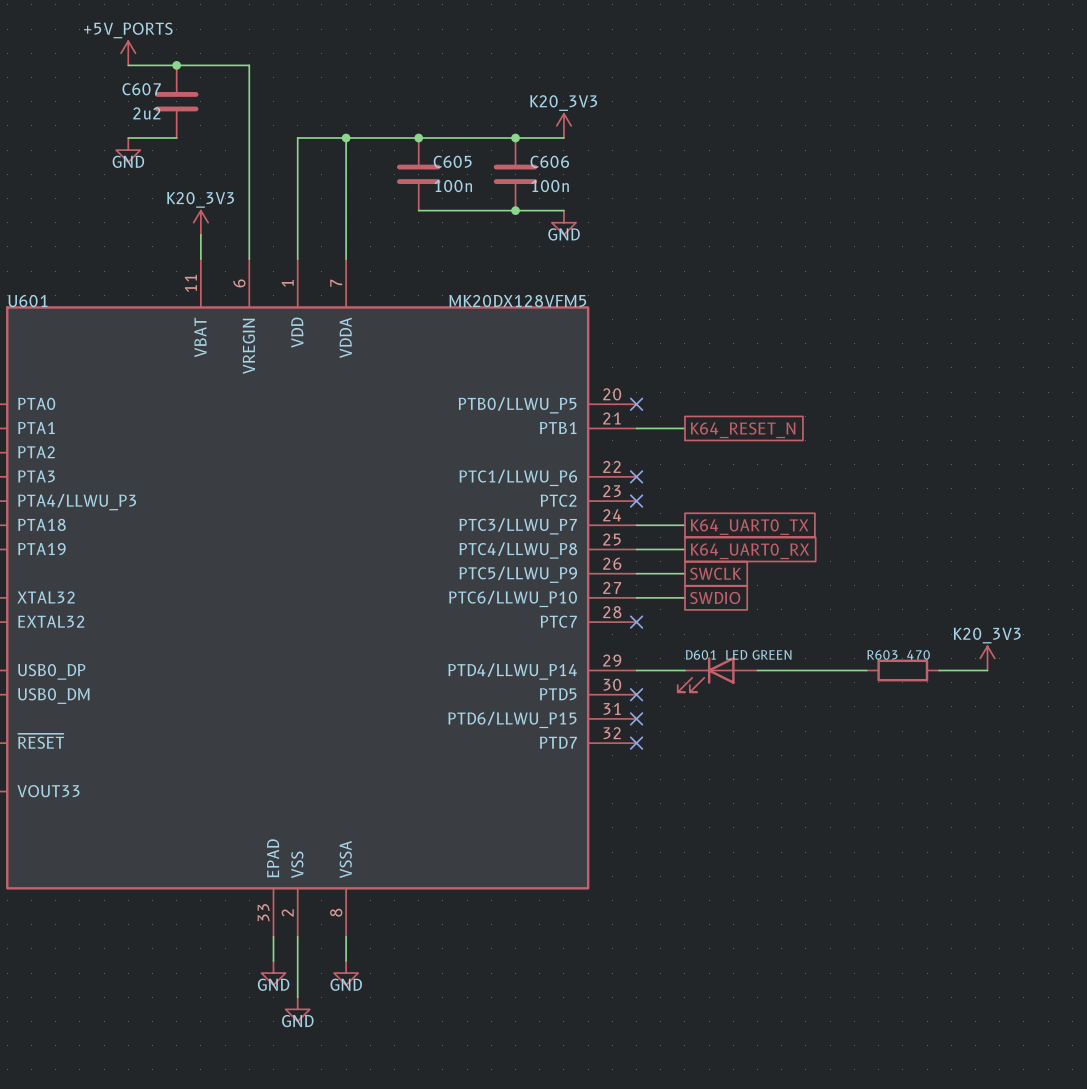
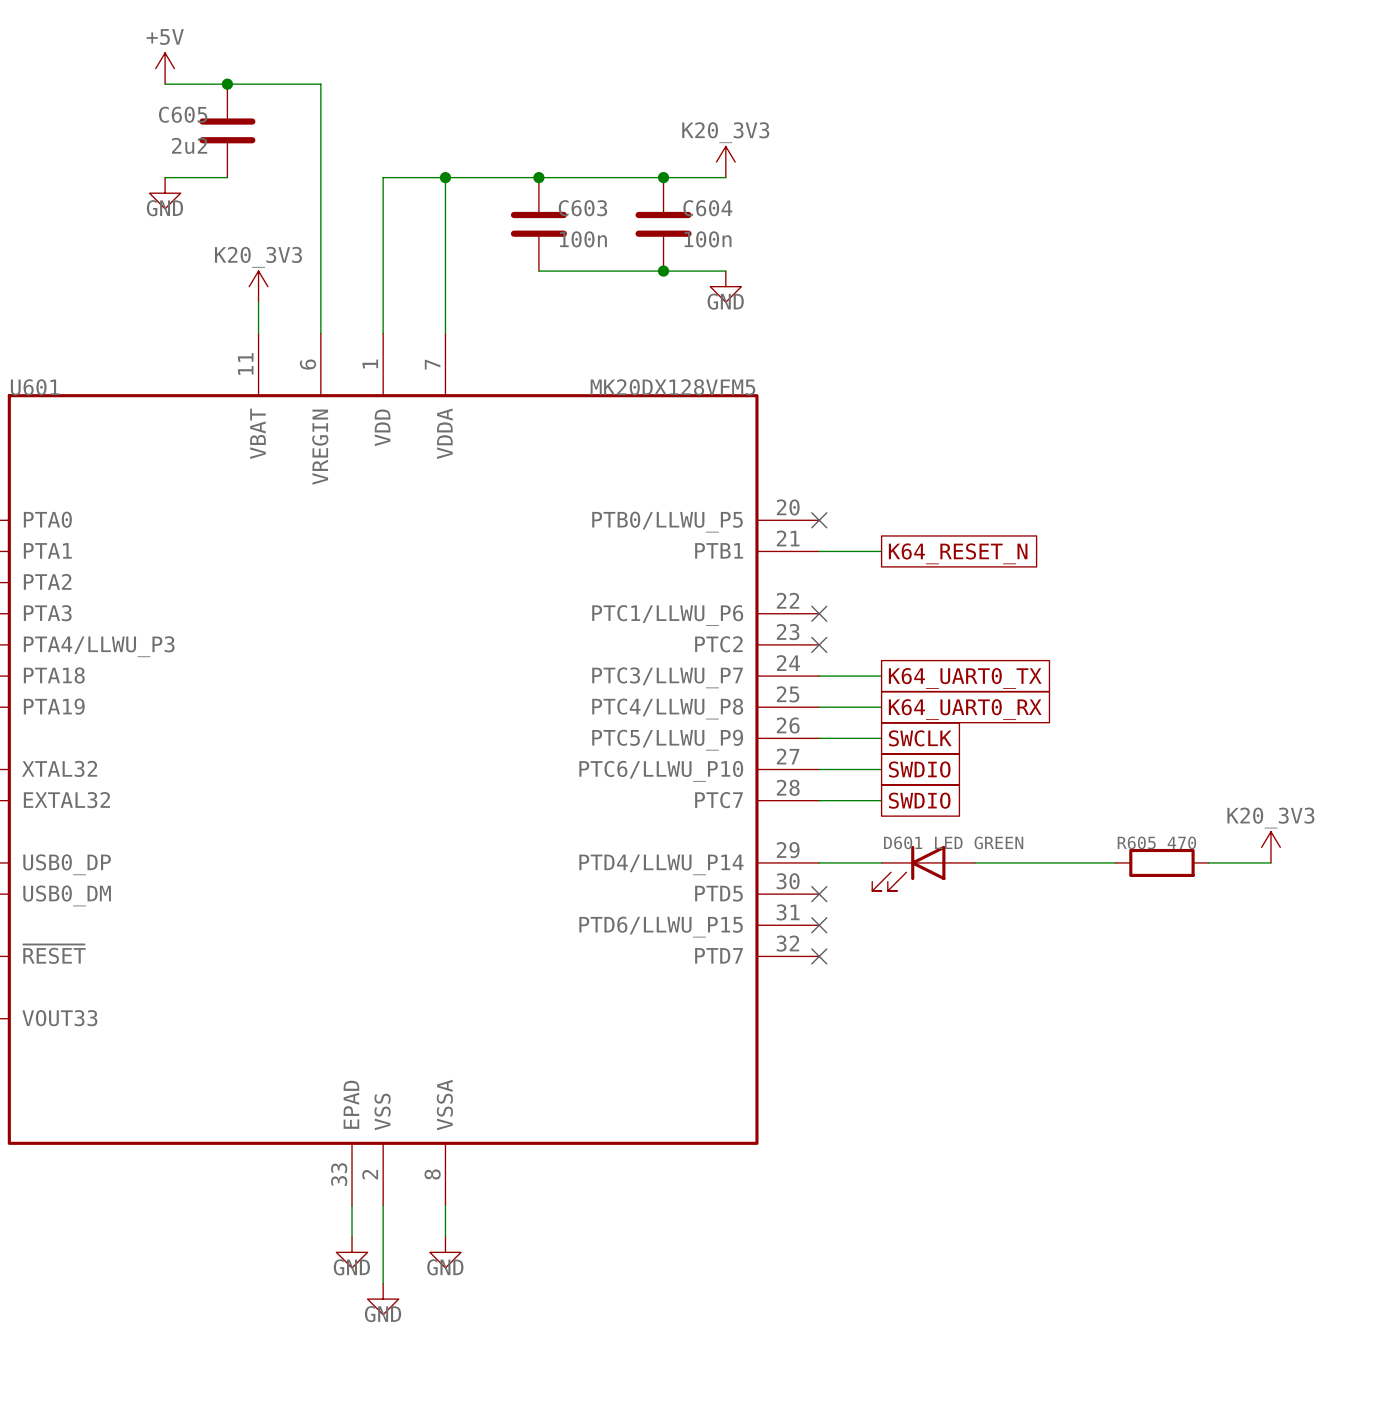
power symbol: +5V_PORTS (128, 53) -> +5V (165, 68)
C607 name: C607 (141, 89) -> C605 (183, 114)
C605 name: C605 (452, 161) -> C603 (582, 208)
C606 name: C606 (549, 161) -> C604 (707, 208)
wire: none -> (819, 800) (881, 800)
no-connect mark: (636, 622) -> none
global label: none -> SWDIO (919, 800)
R603 name: R603 (882, 654) -> R605 (1136, 842)

